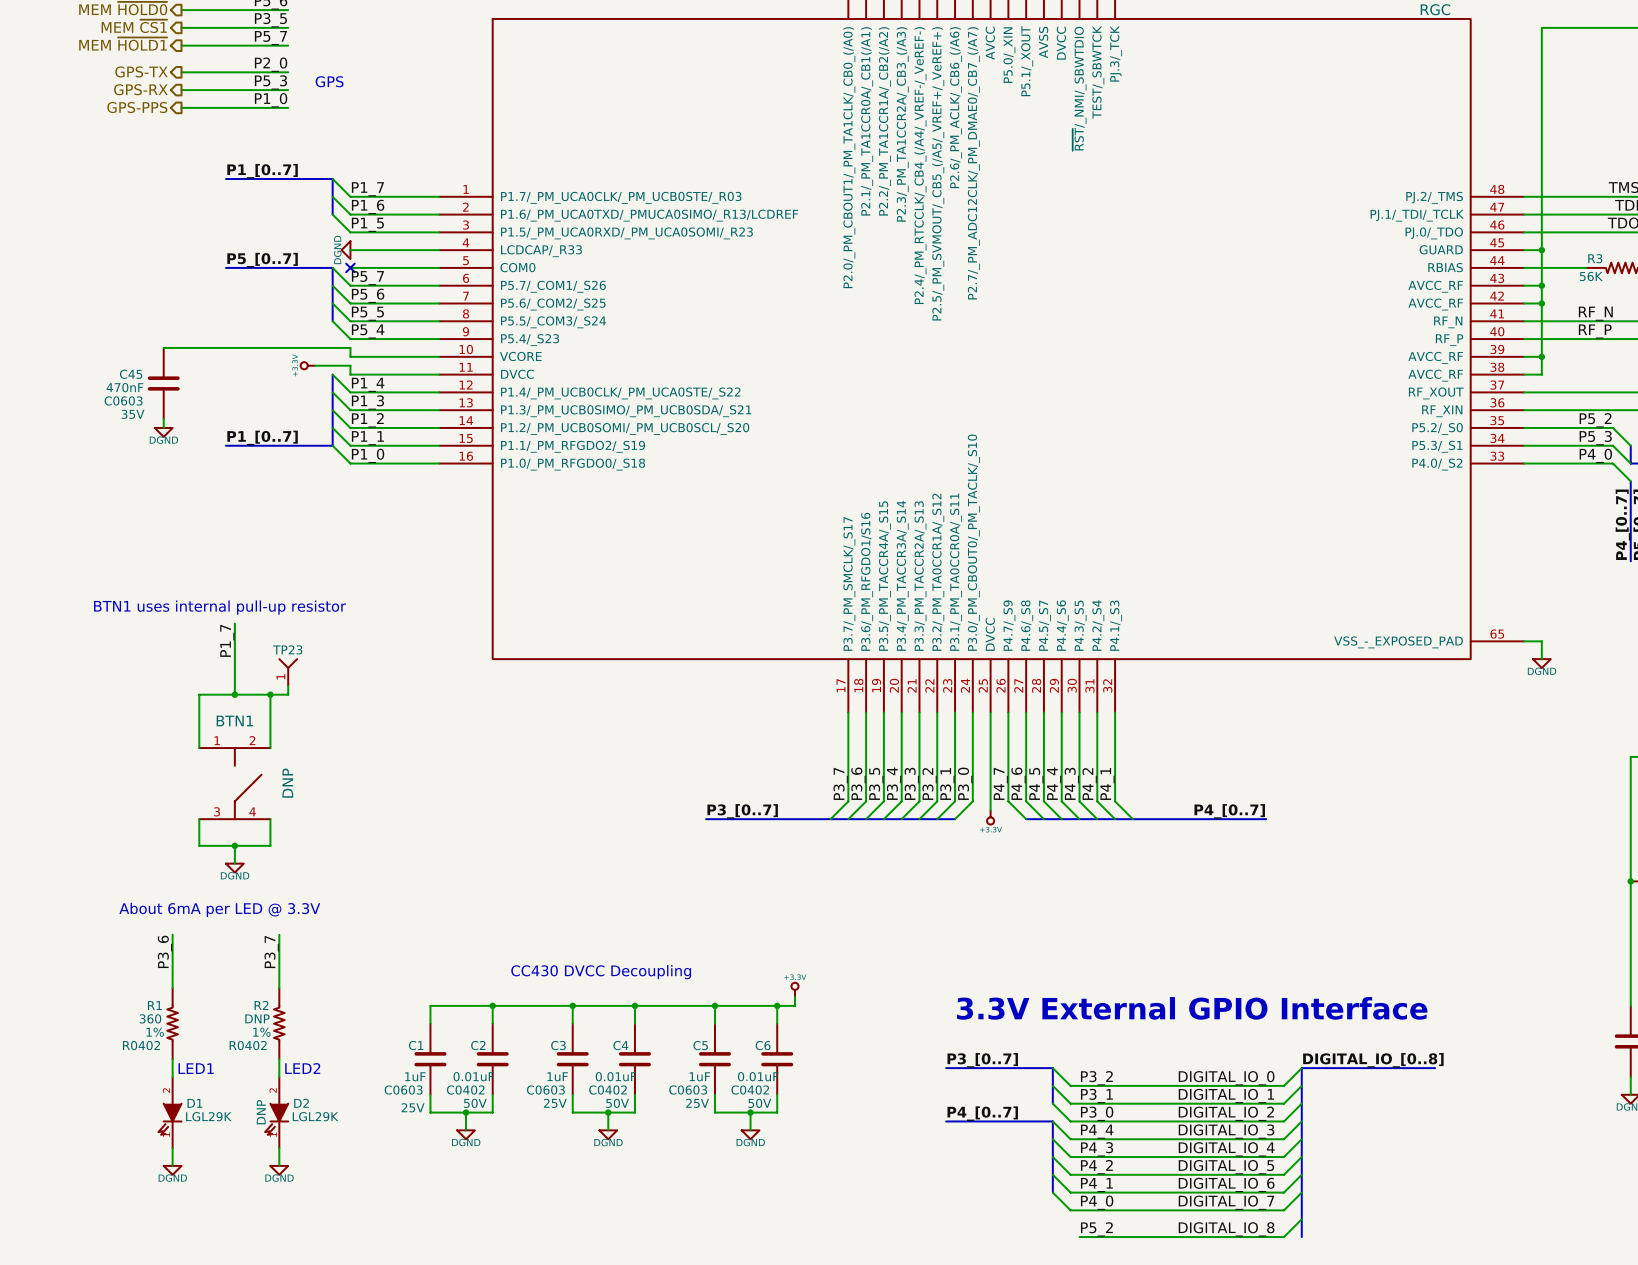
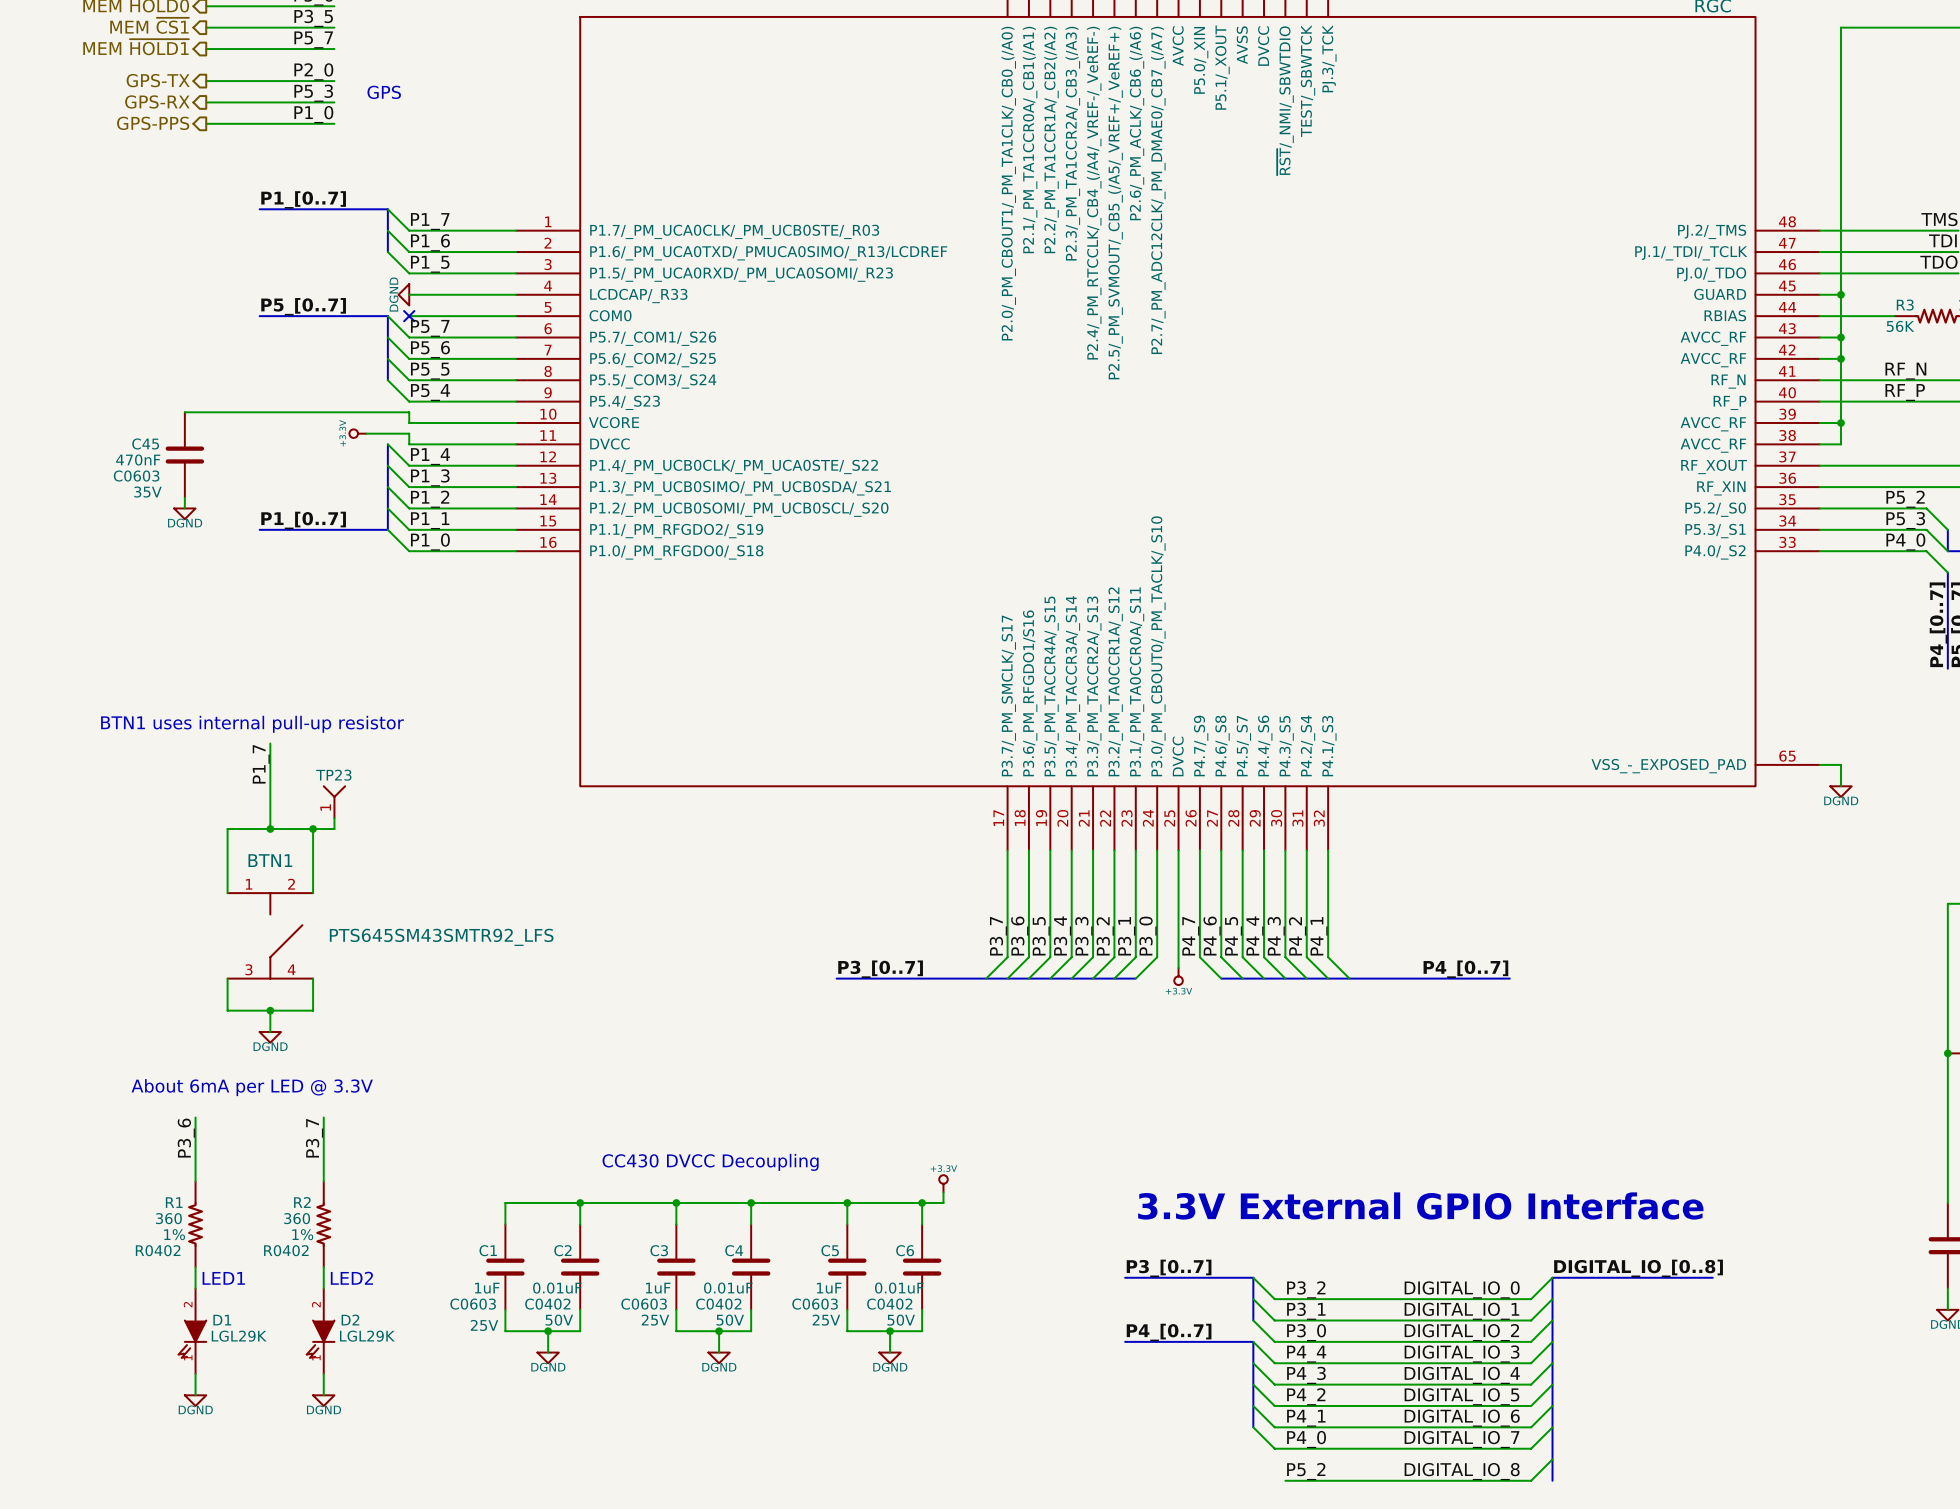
BTN1 value: DNP (287, 783) -> PTS645SM43SMTR92_LFS (441, 937)
R2 value: DNP (257, 1018) -> 360 (297, 1218)
D2 value: DNP (261, 1112) -> none

